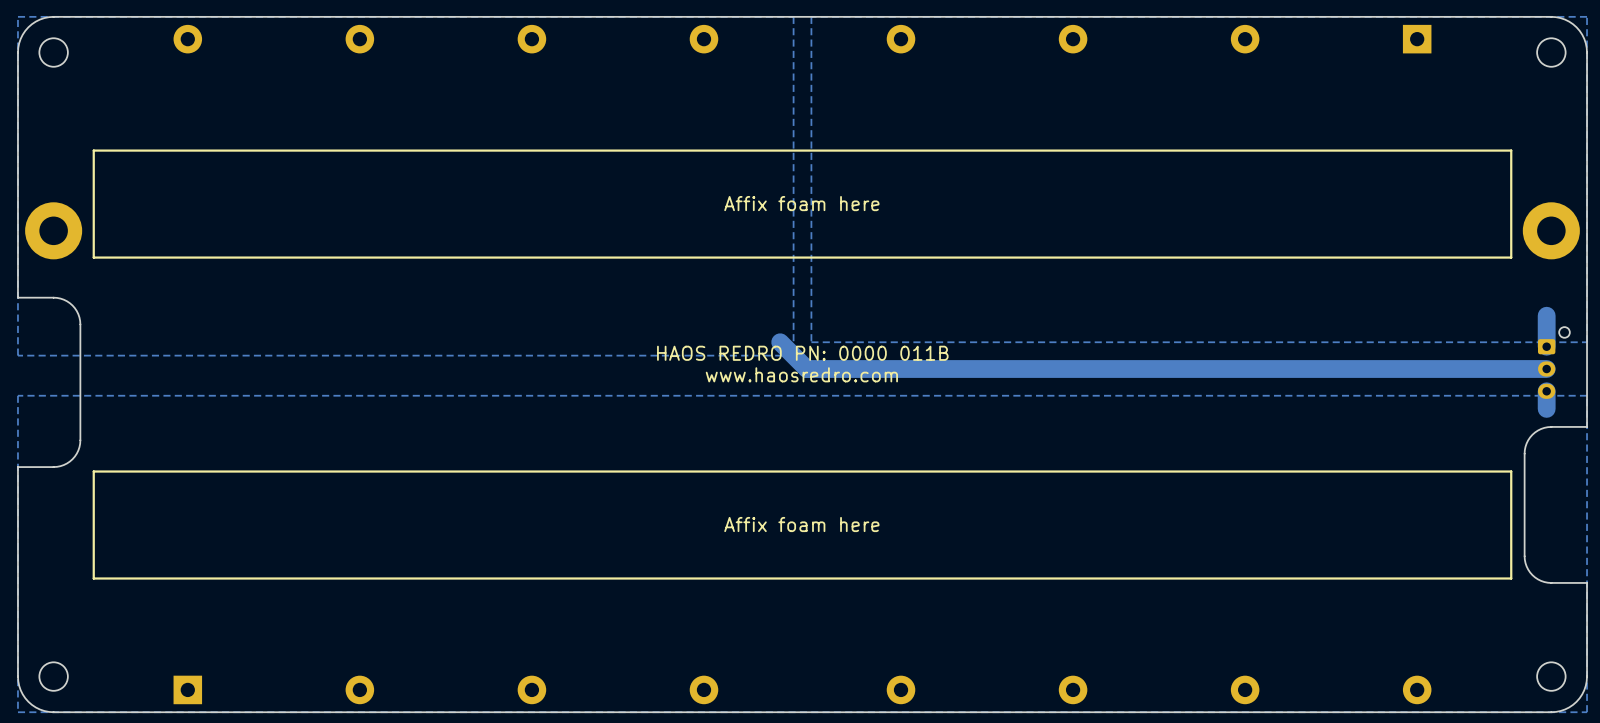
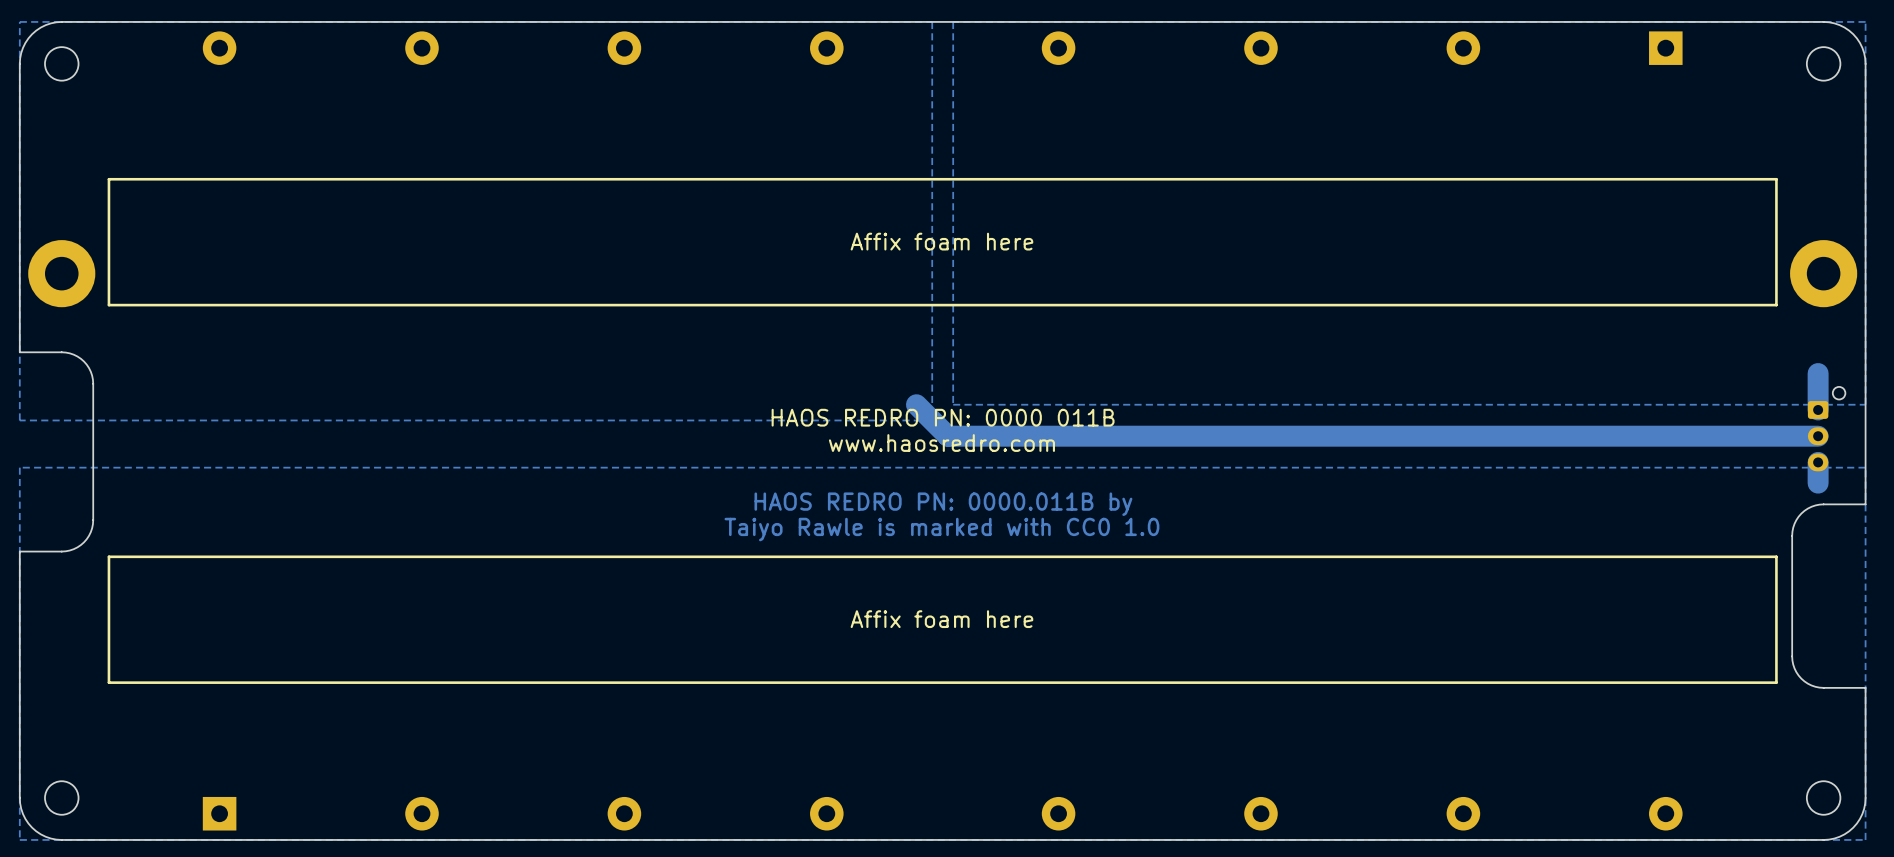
text: none -> HAOS REDRO PN: 0000.011B by (943, 504)
text: none -> Taiyo Rawle is marked with CC0 1.0 (941, 529)

